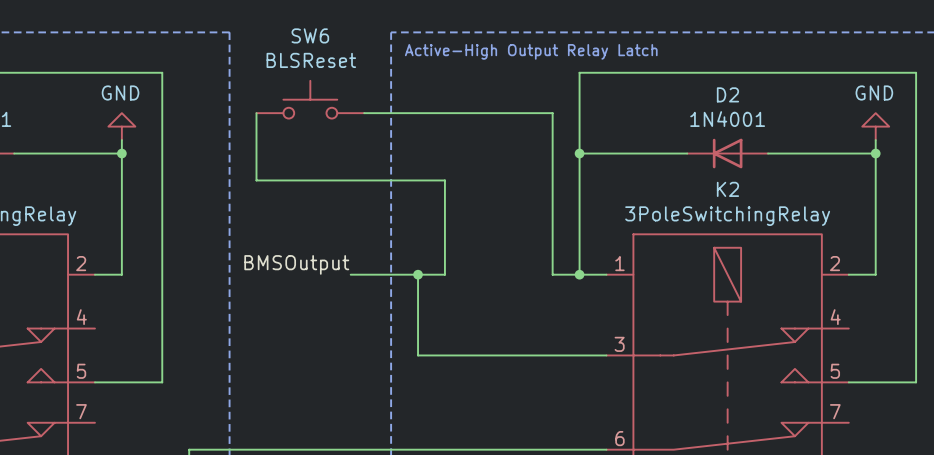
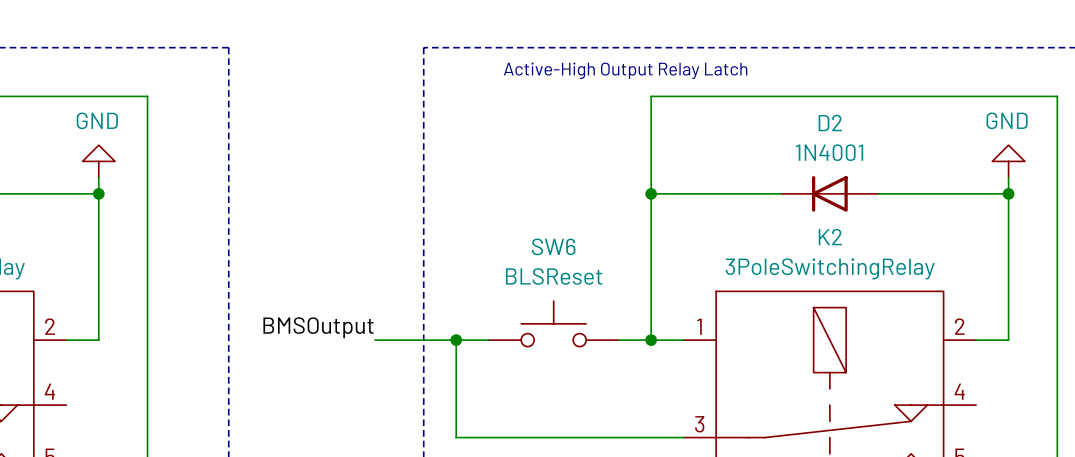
SW6 position: (310, 99) -> (553, 323)
wire: (256, 113) (256, 180) (444, 180) (444, 274) -> none
wire: (364, 113) (552, 113) (552, 274) -> none

